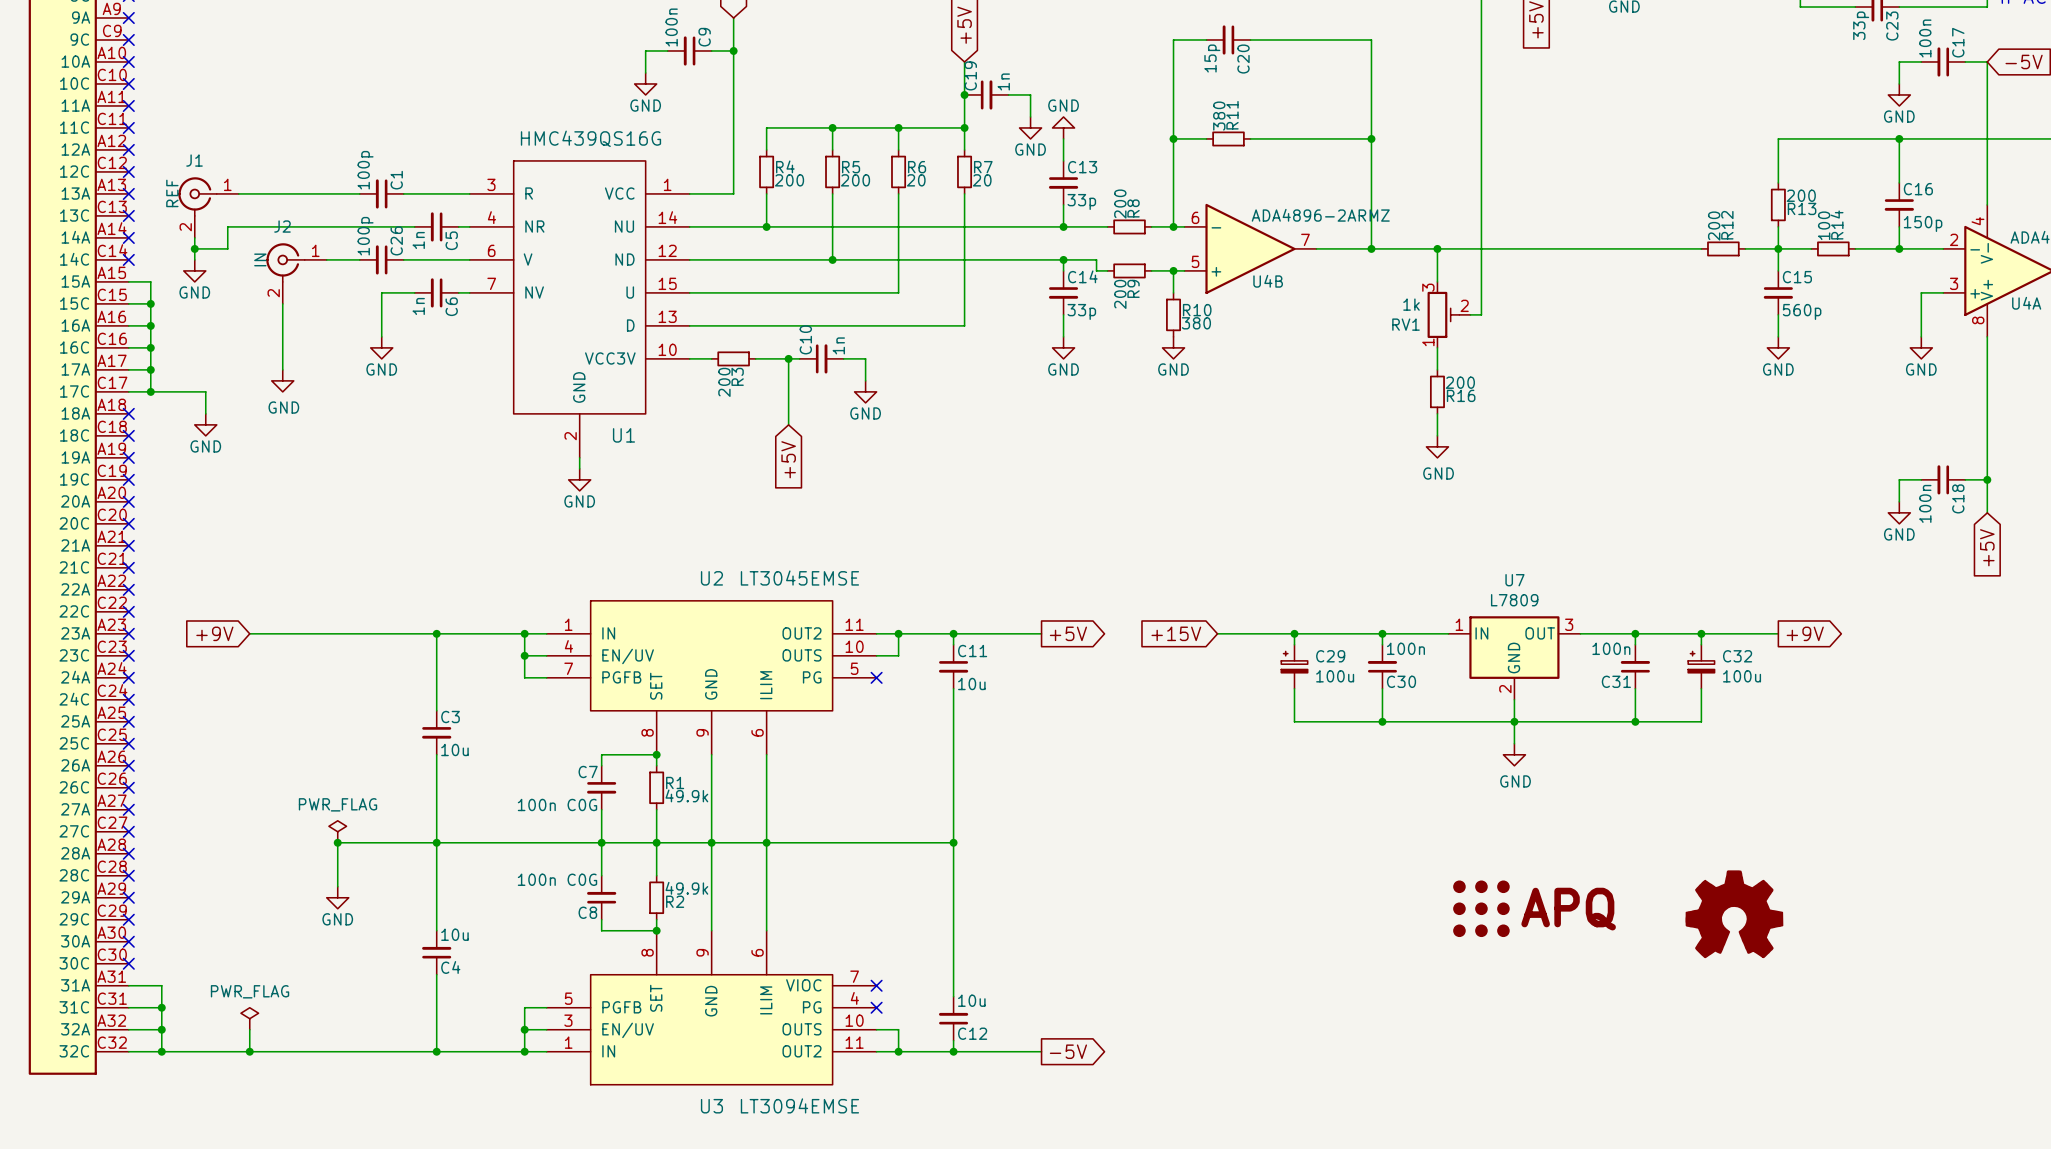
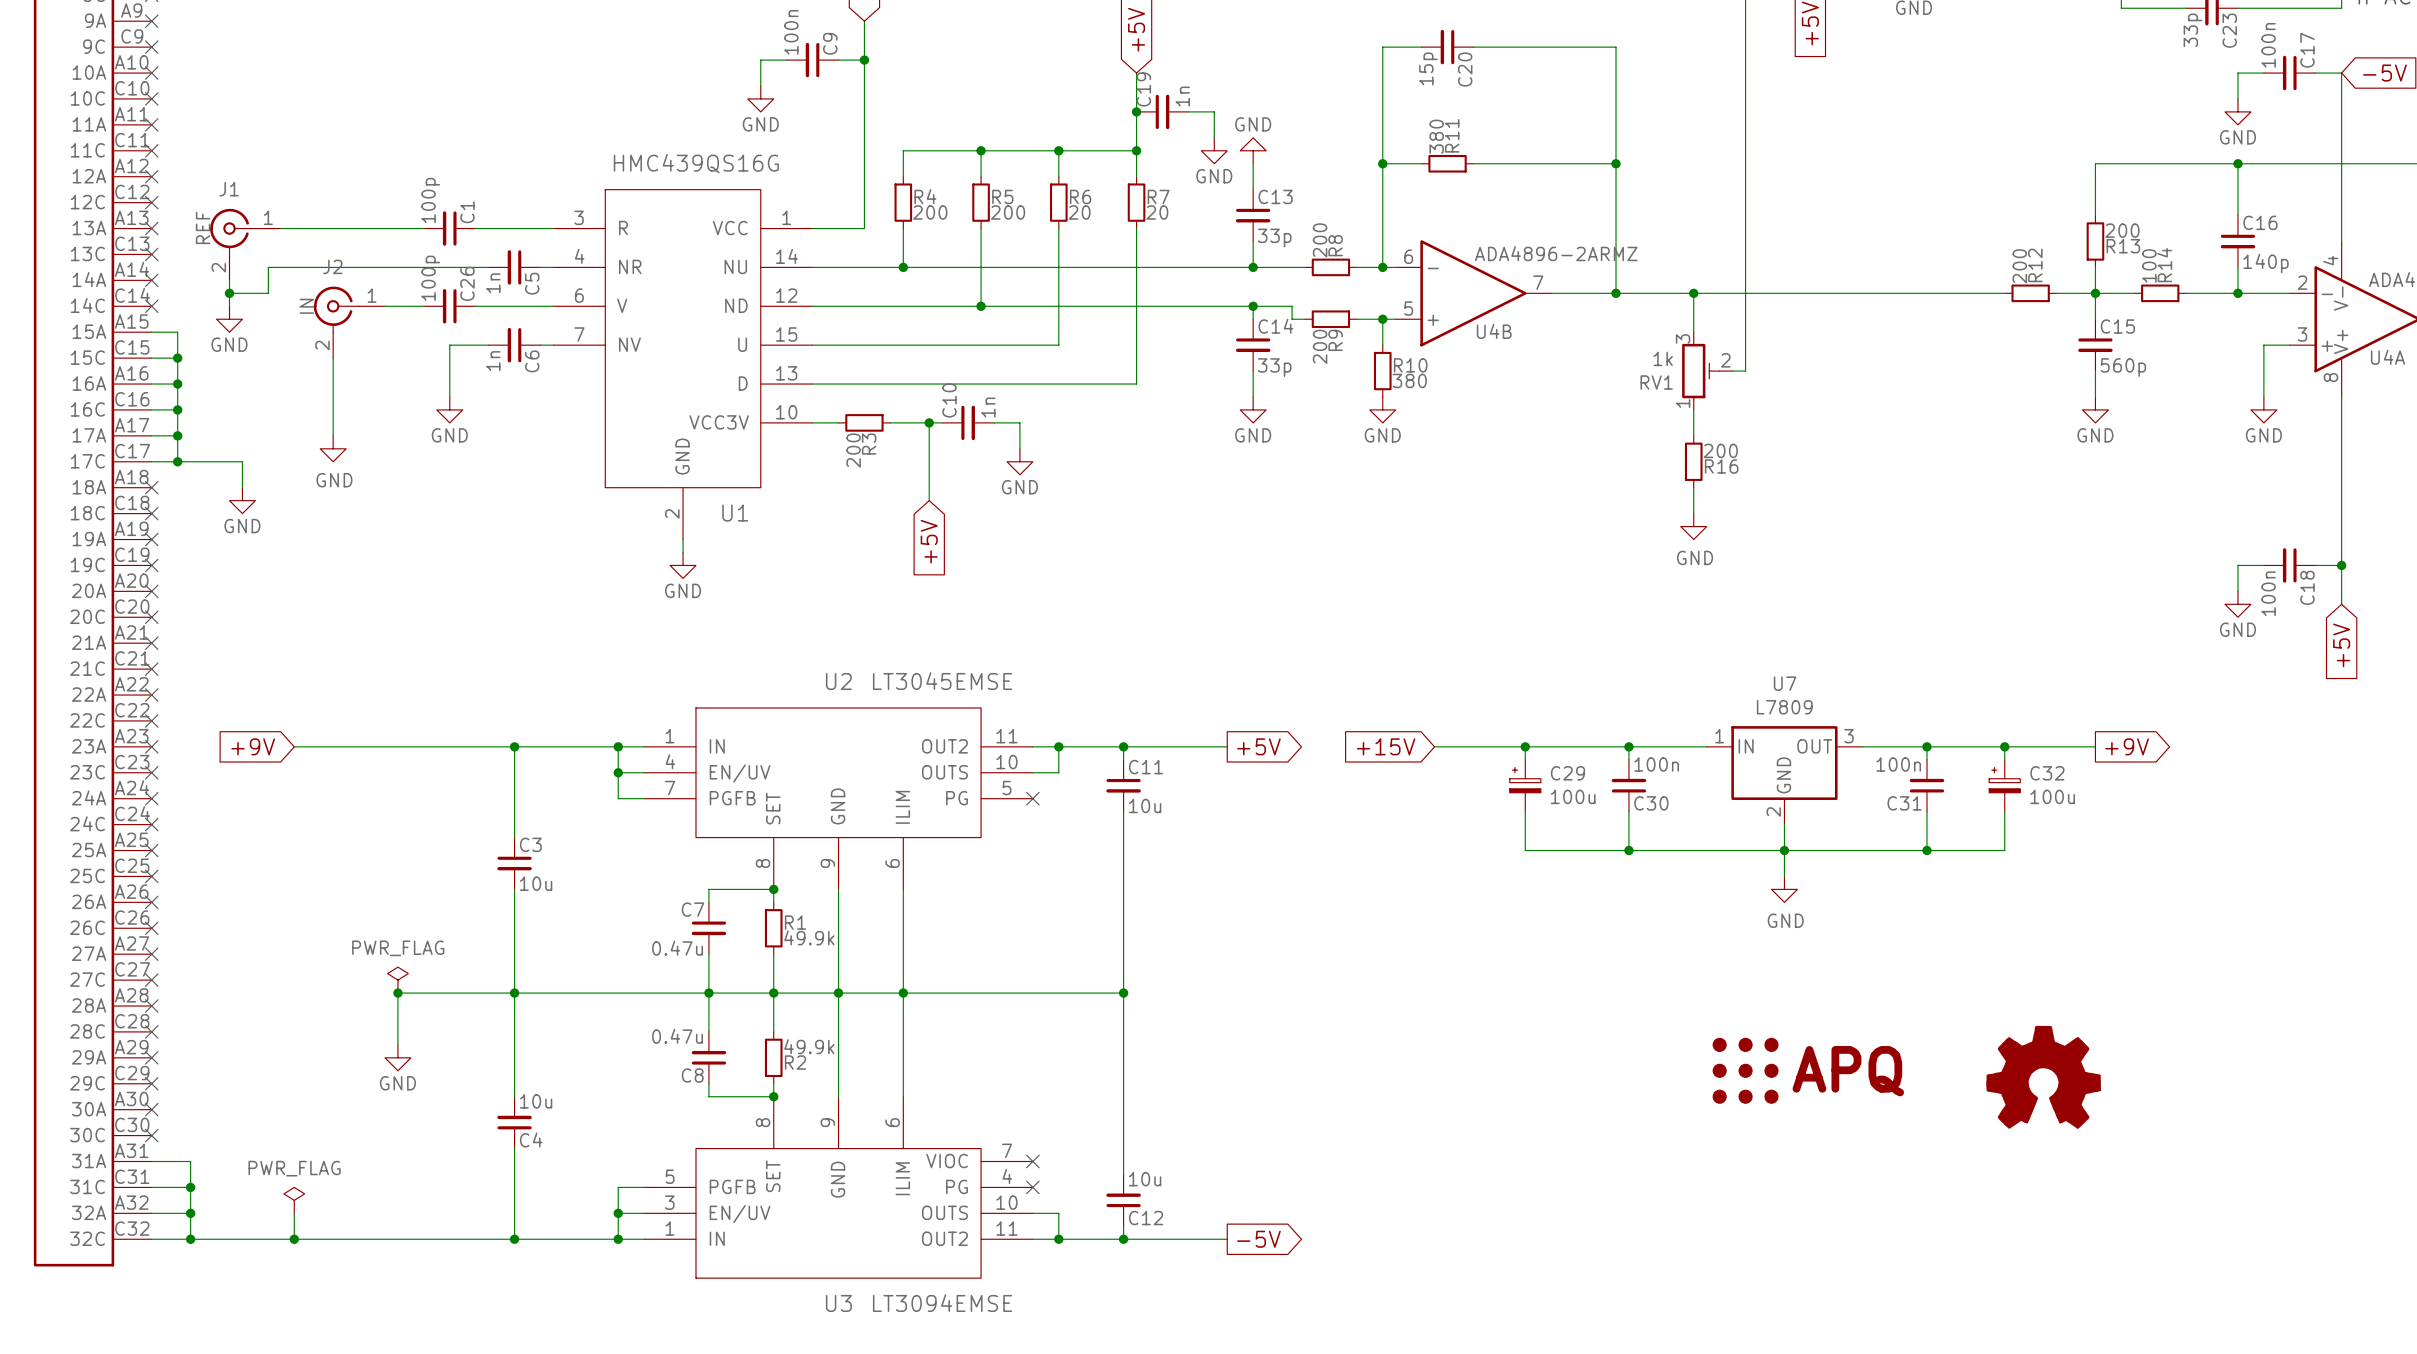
C16 value: 150p (1923, 223) -> 140p (2265, 263)
C7 value: 100n C0G (557, 804) -> 0.47u (677, 948)
C8 value: 100n C0G (557, 879) -> 0.47u (677, 1036)

